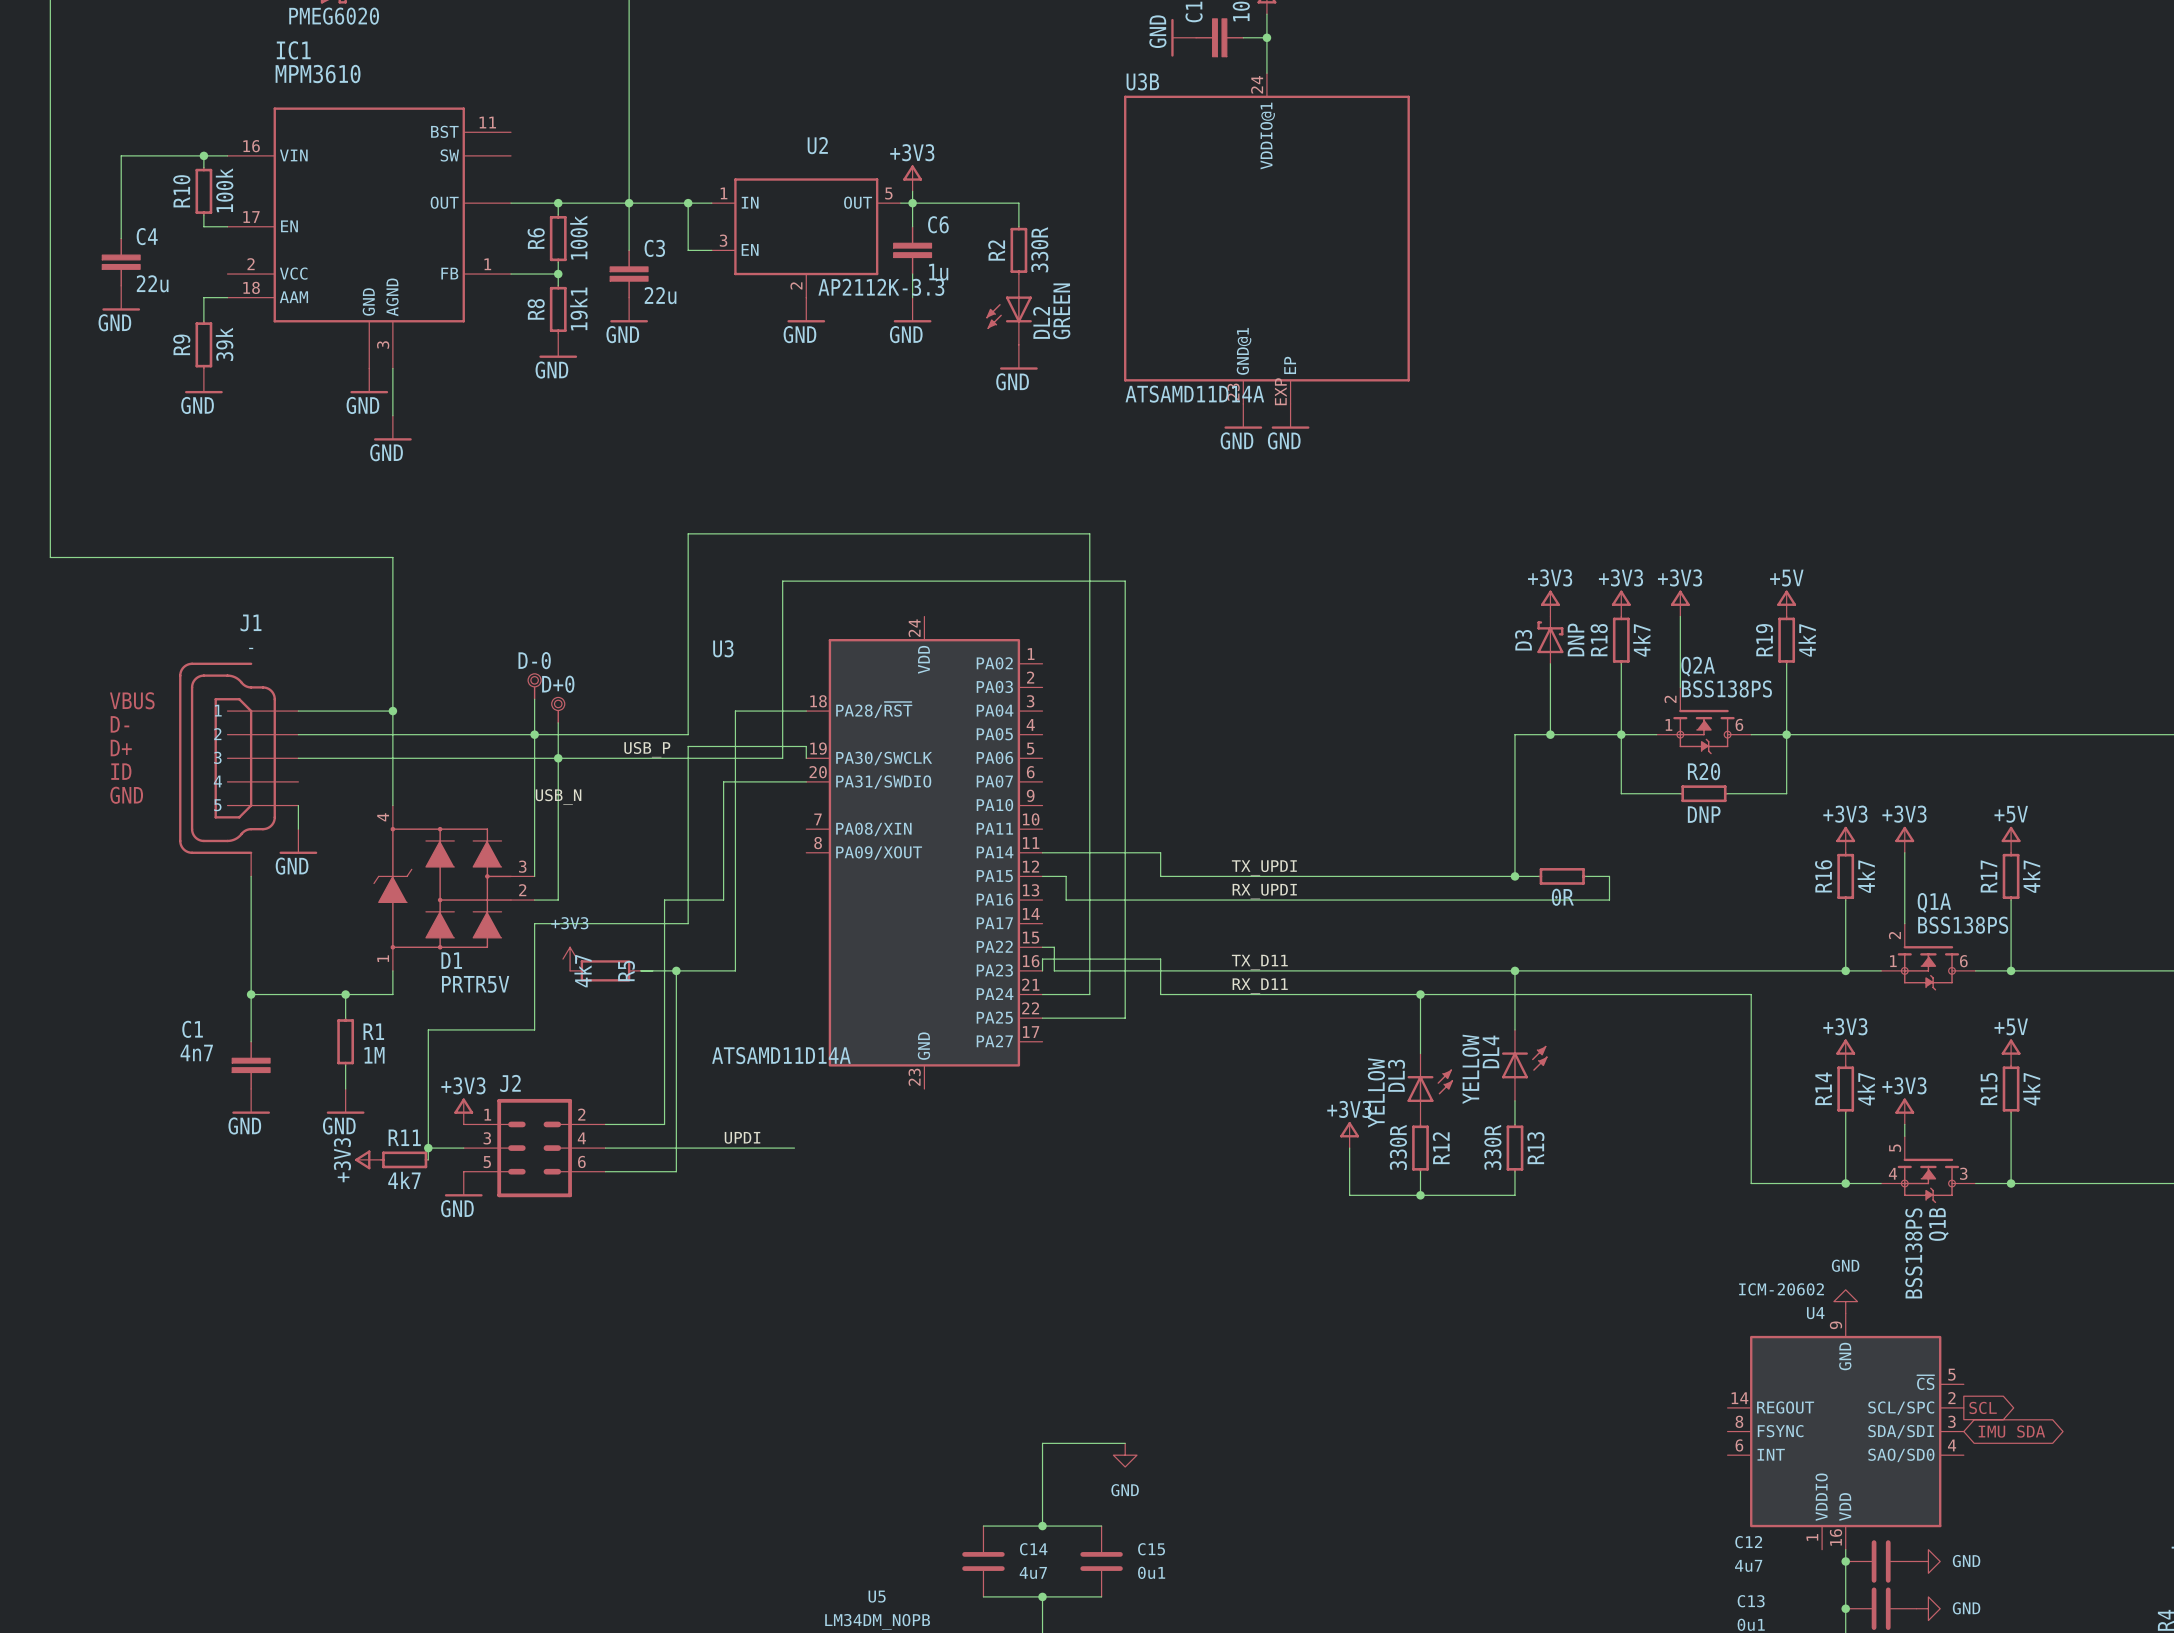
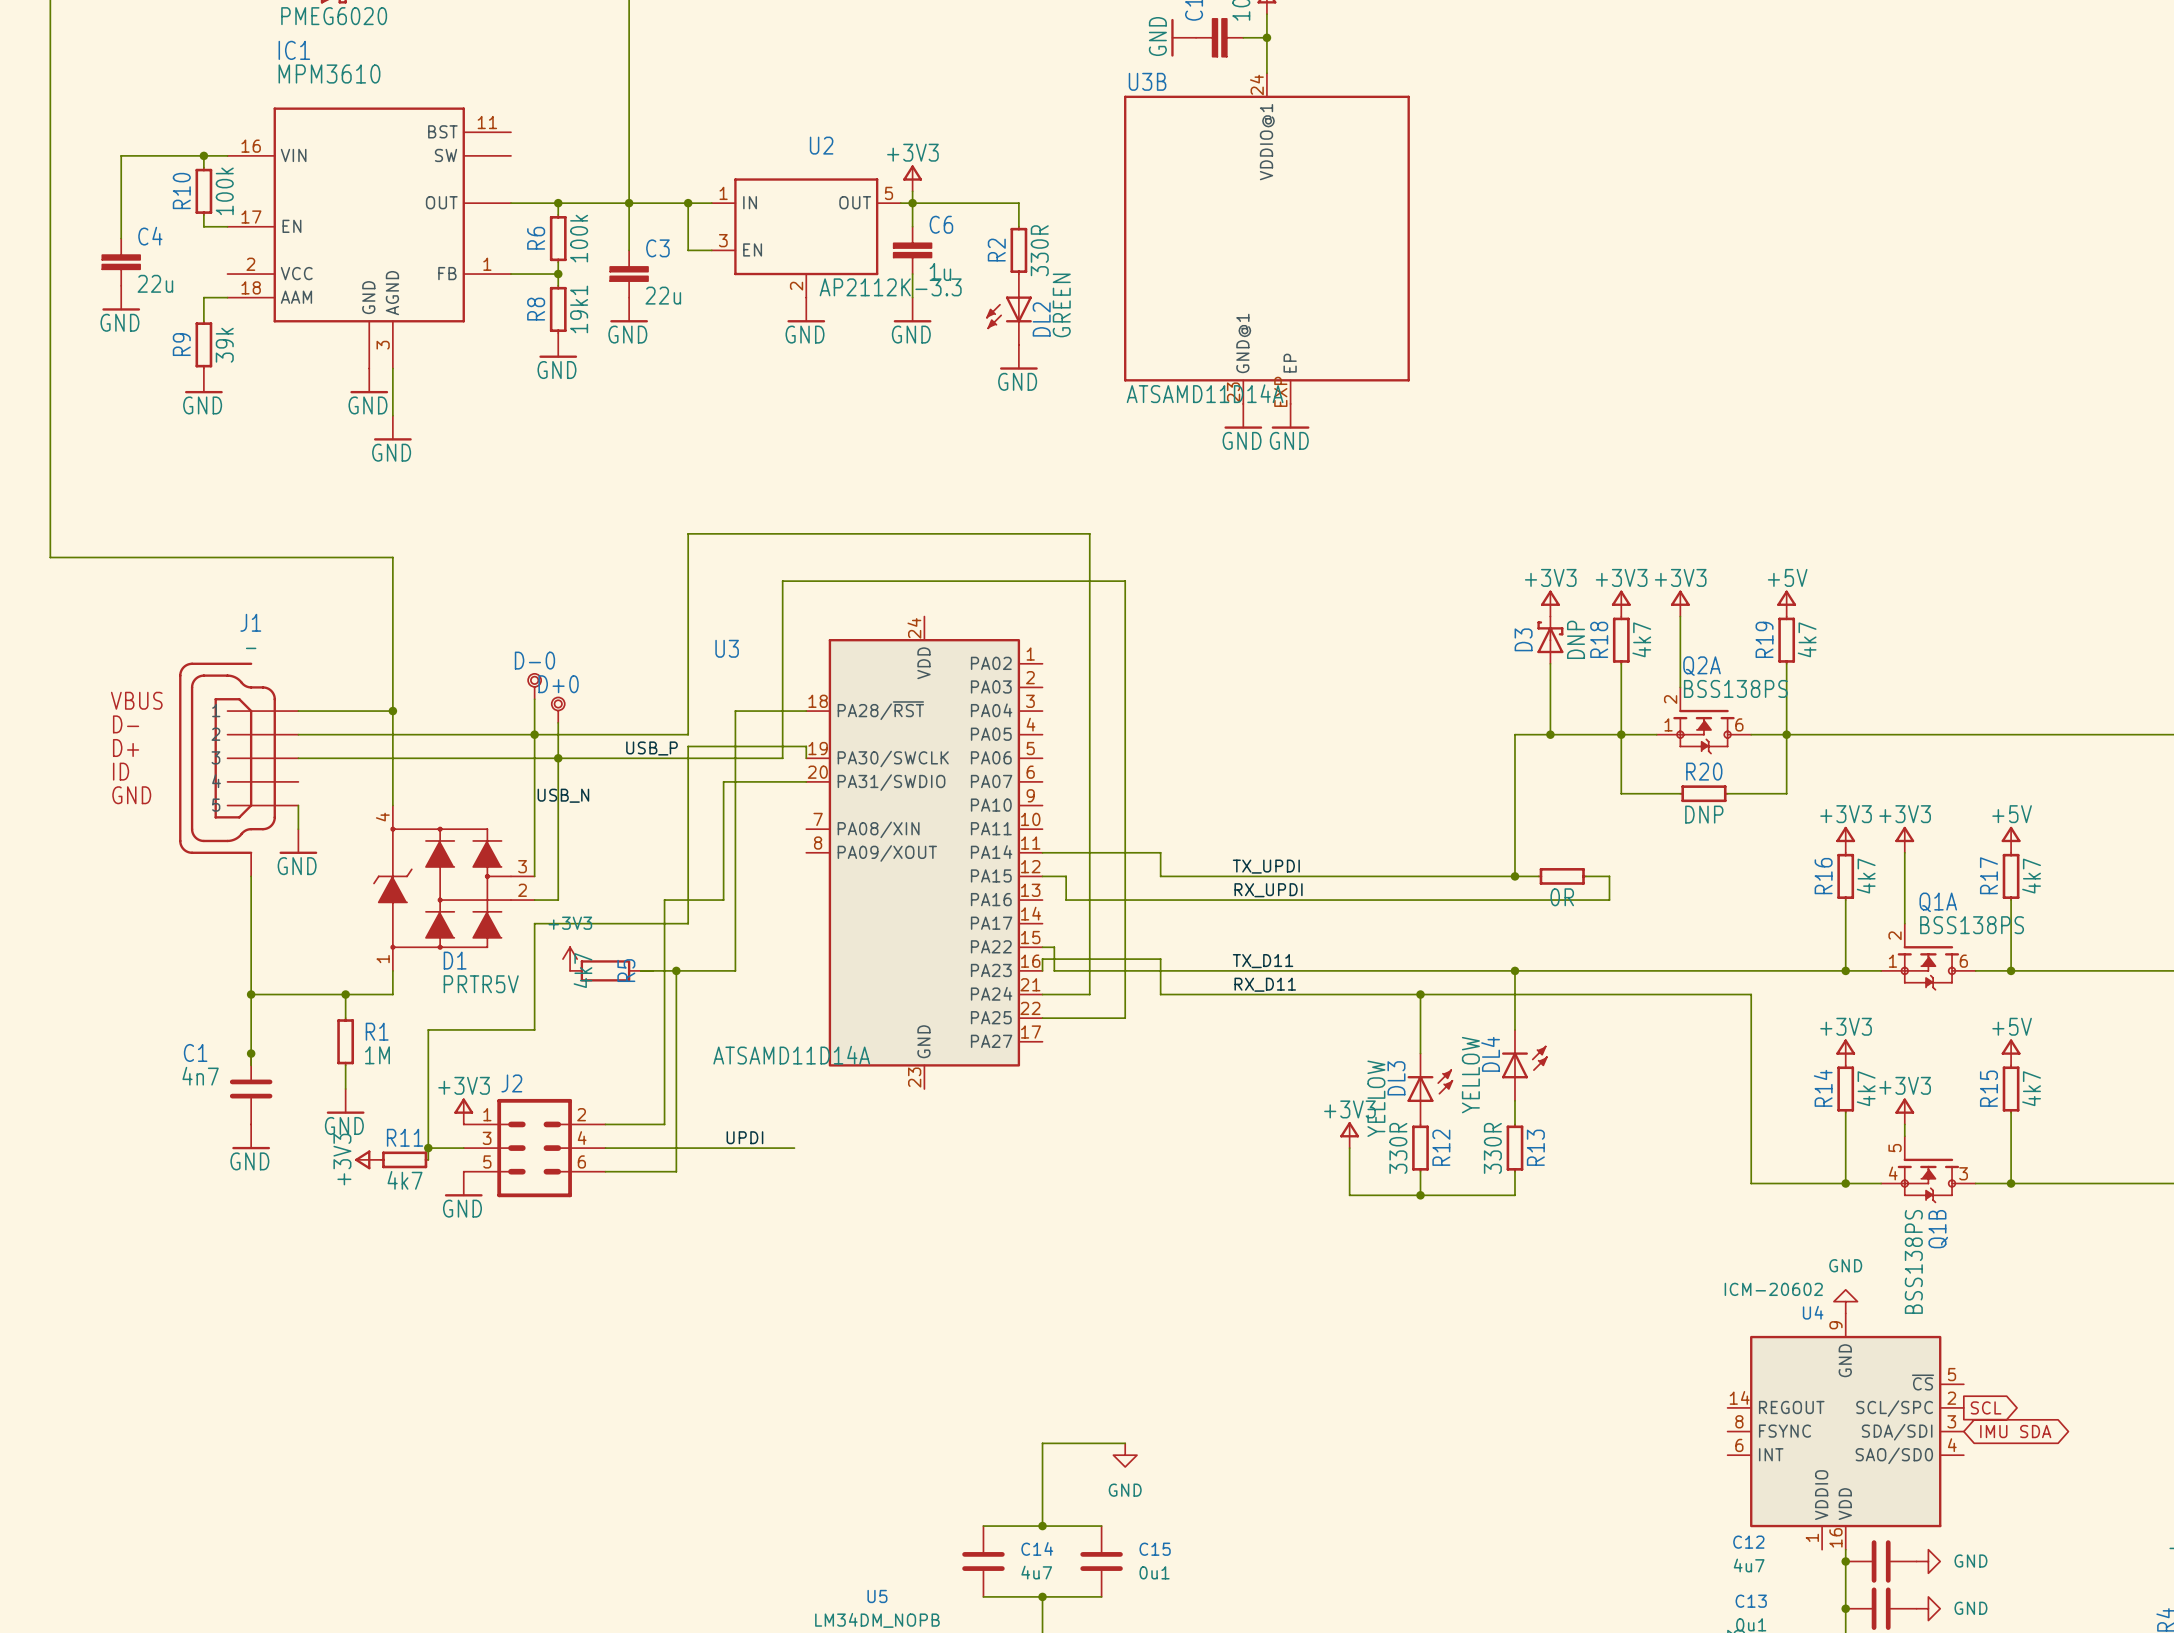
C1 symbol: [232, 1041, 271, 1090] -> [229, 1053, 273, 1125]
junction: none -> (251, 1053)
power symbol position: GND (251, 1101) -> GND (251, 1136)

